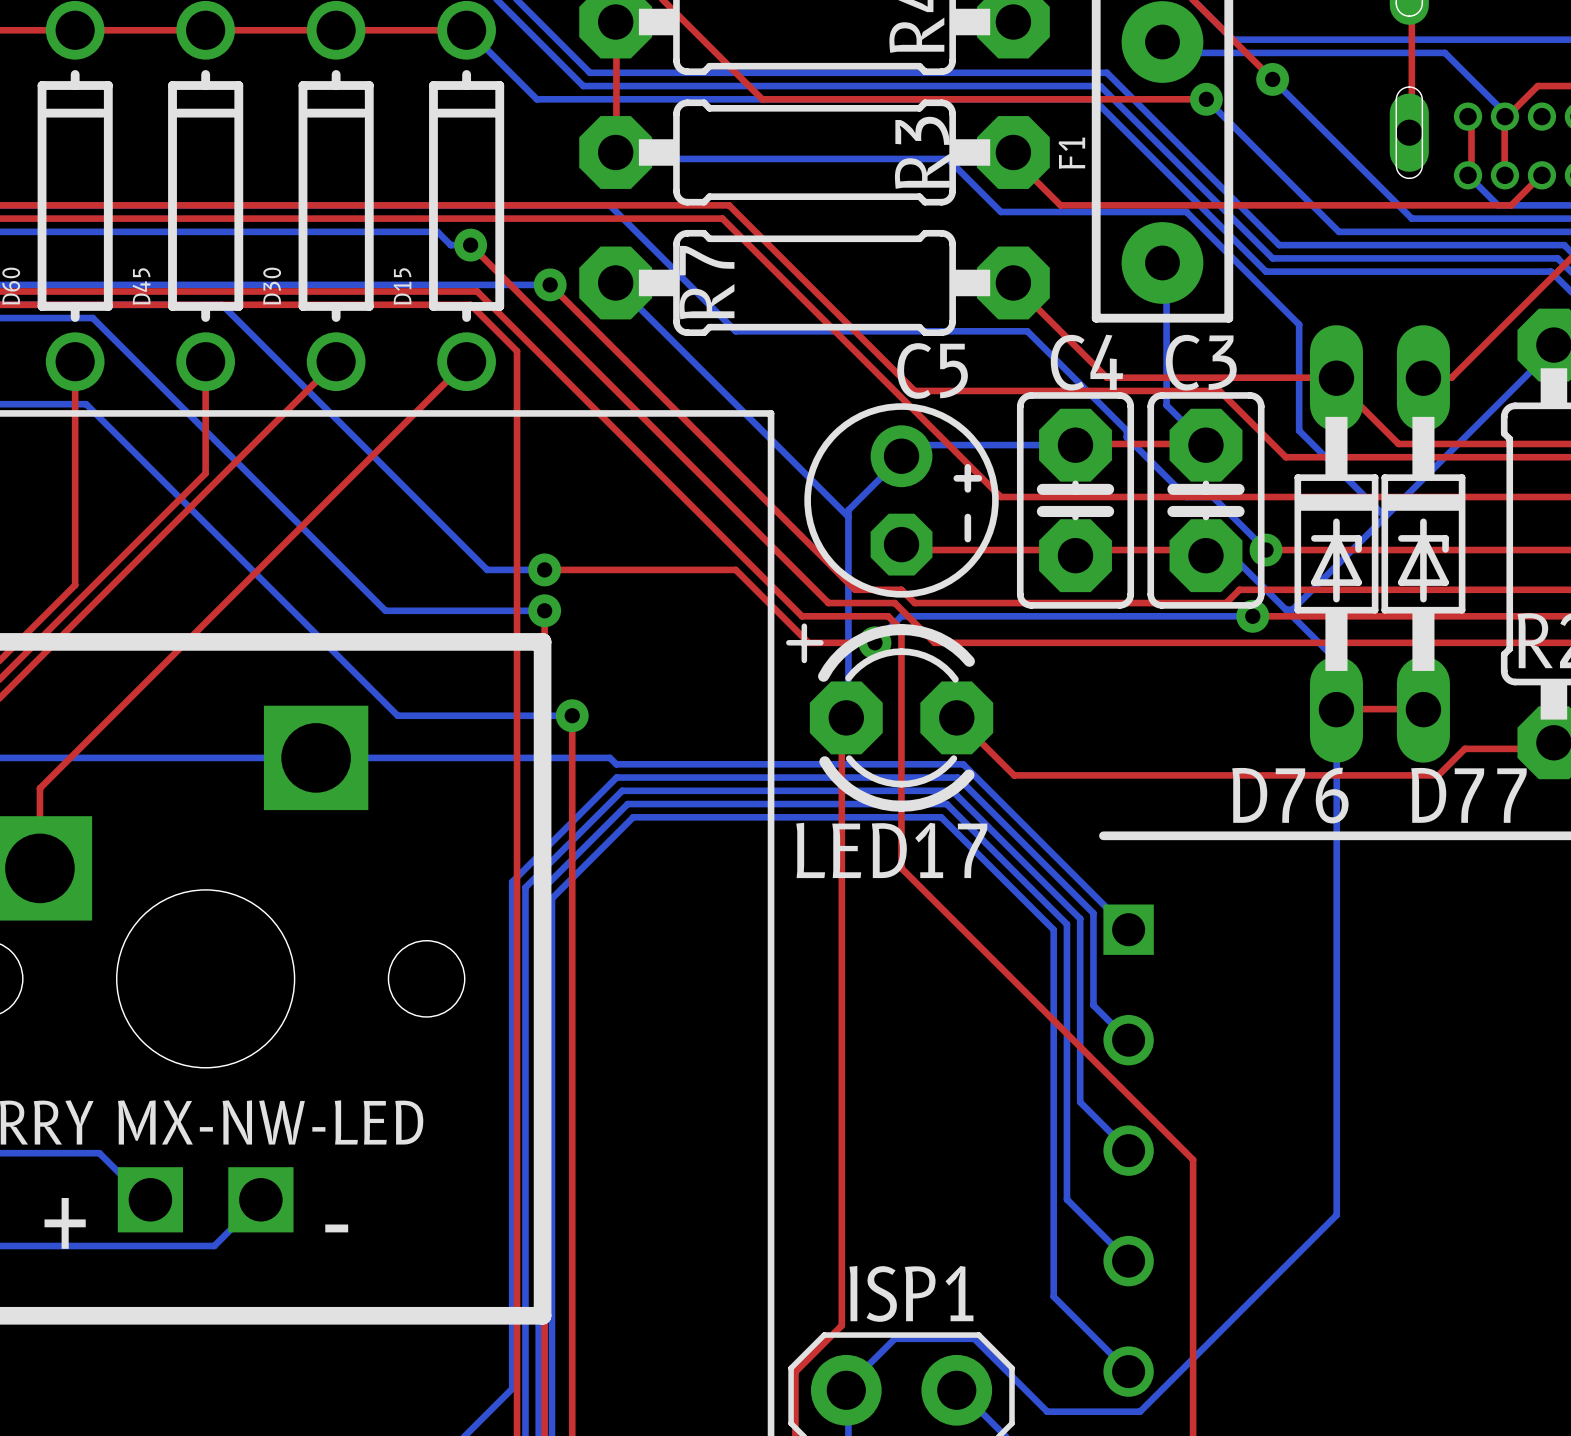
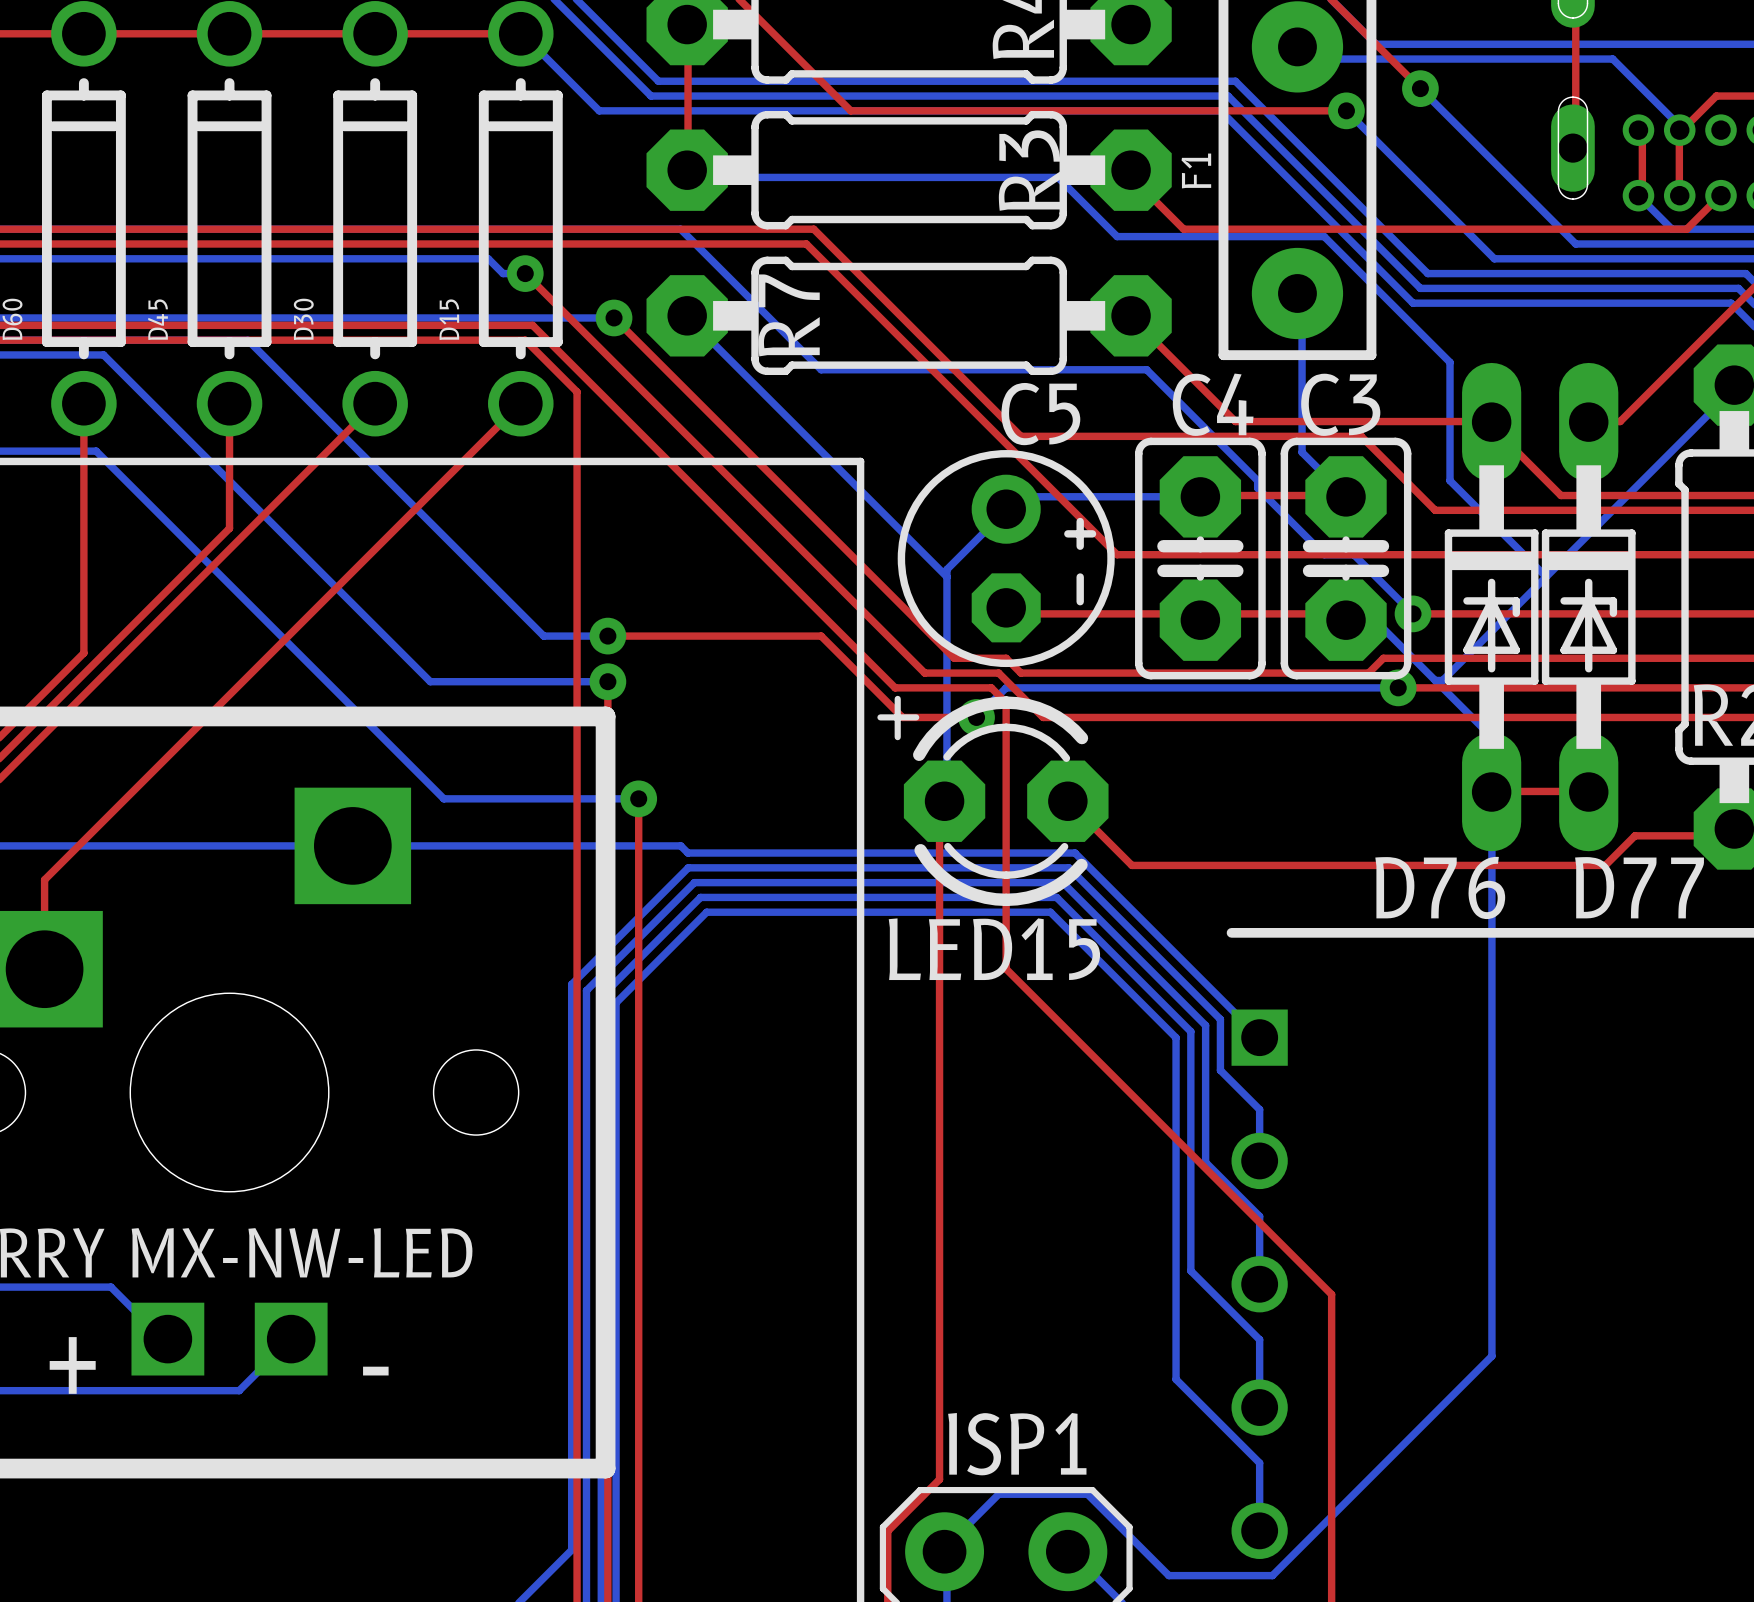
LED17 name: LED17 (891, 850) -> LED15 (994, 949)
bottom track: (1093, 959) (1093, 1005) (1128, 1040) -> (1220, 1070) (1259, 1109) (1259, 1160)
bottom track: (1080, 1041) (1080, 1102) (1128, 1150) -> (1205, 1162) (1259, 1216) (1259, 1284)
bottom track: (1066, 1138) (1066, 1199) (1128, 1261) -> (1190, 1270) (1259, 1339) (1259, 1407)
bottom track: (1053, 1235) (1053, 1296) (1128, 1371) -> (1176, 1379) (1259, 1463) (1259, 1530)

